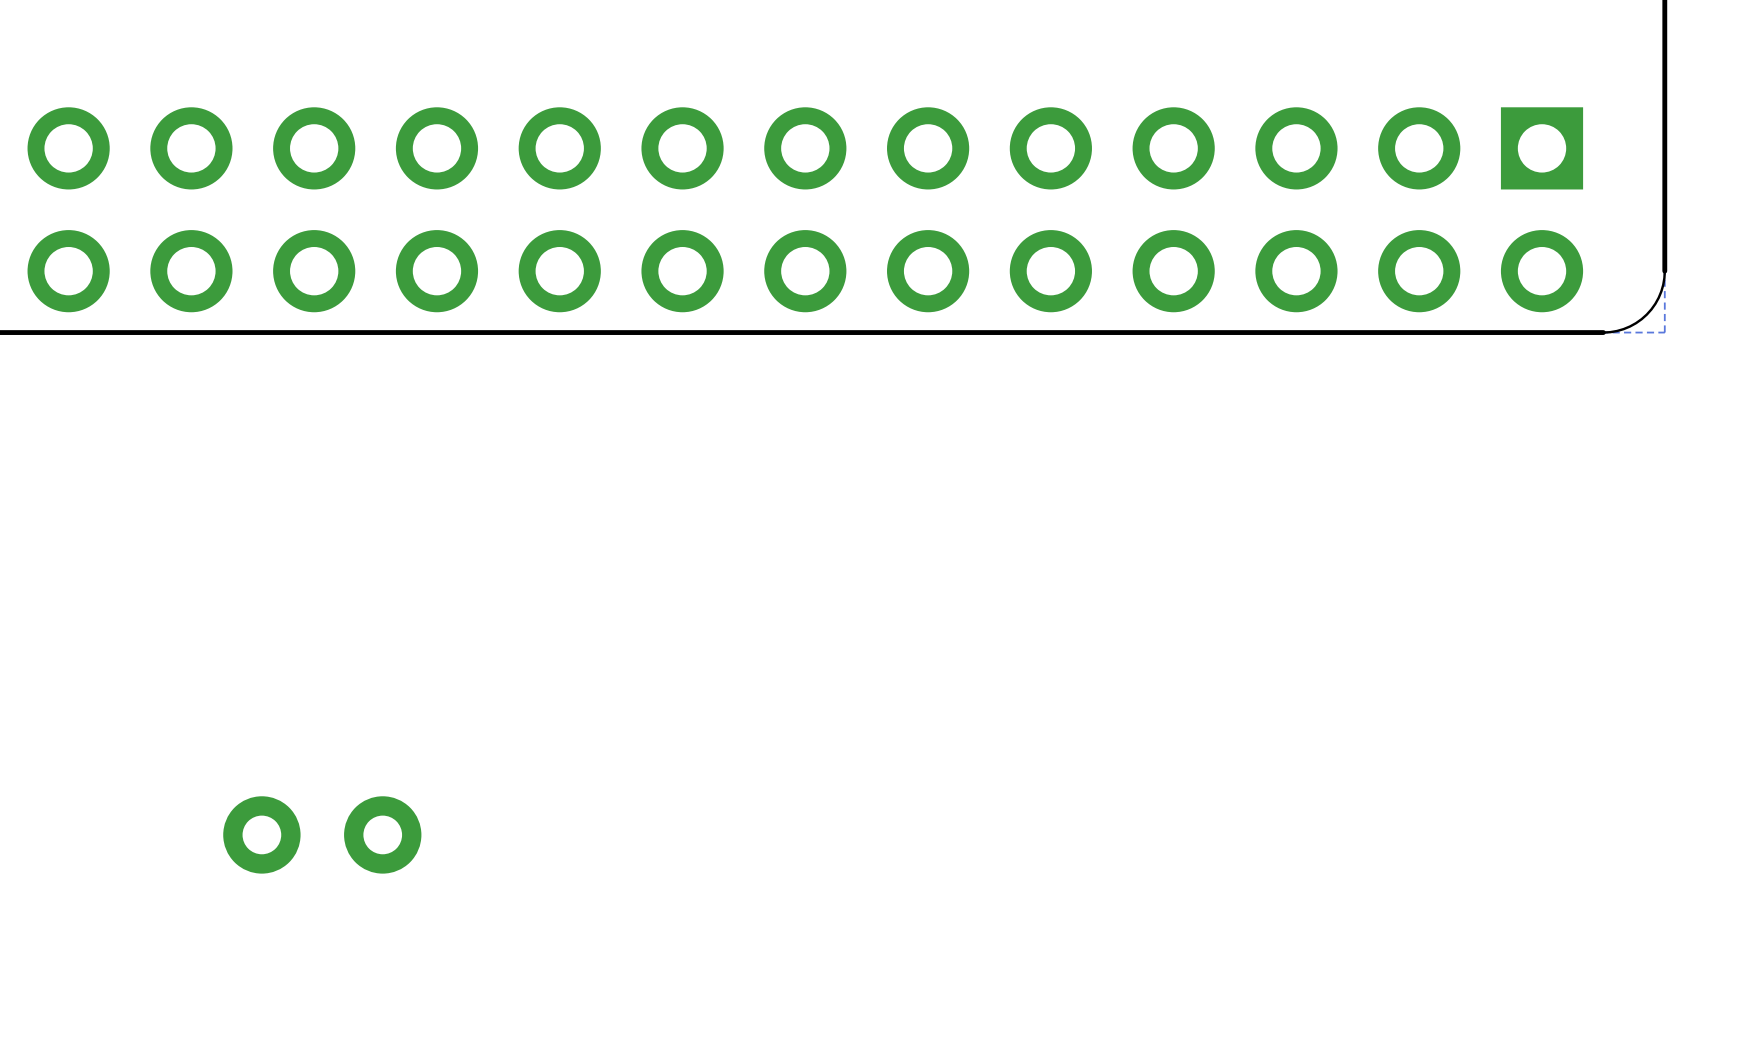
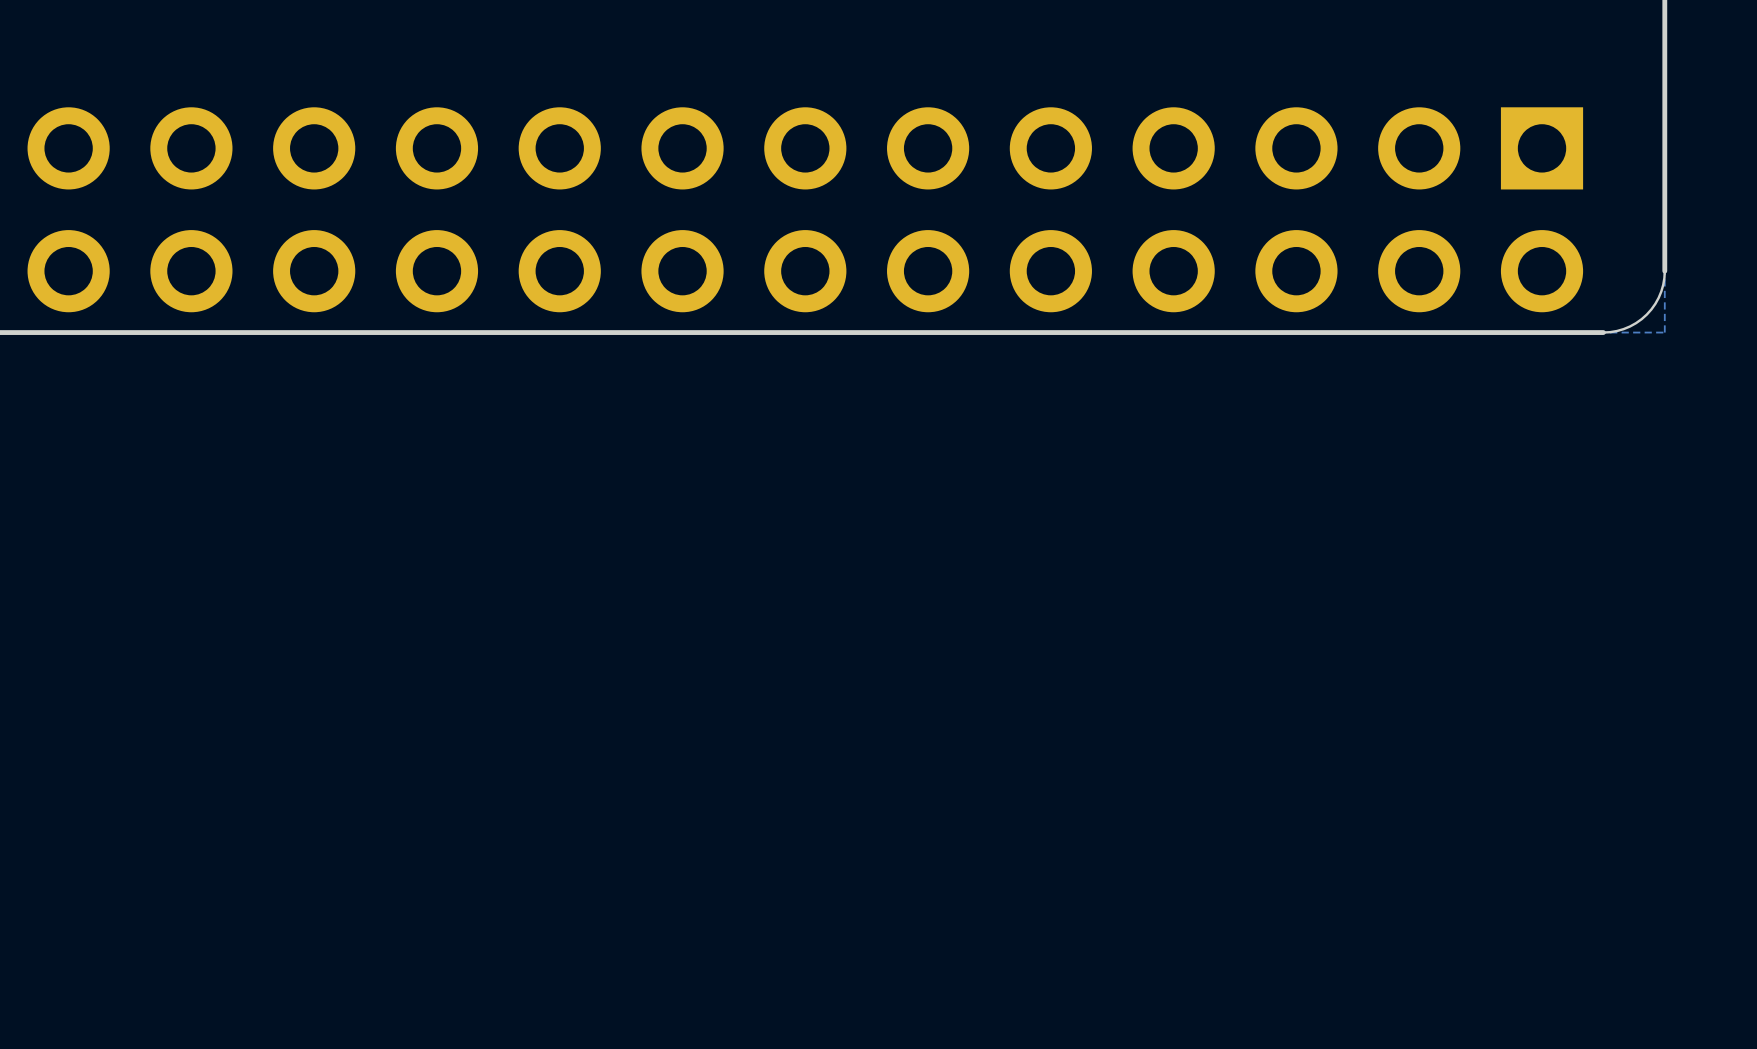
part: (322, 834) -> none

